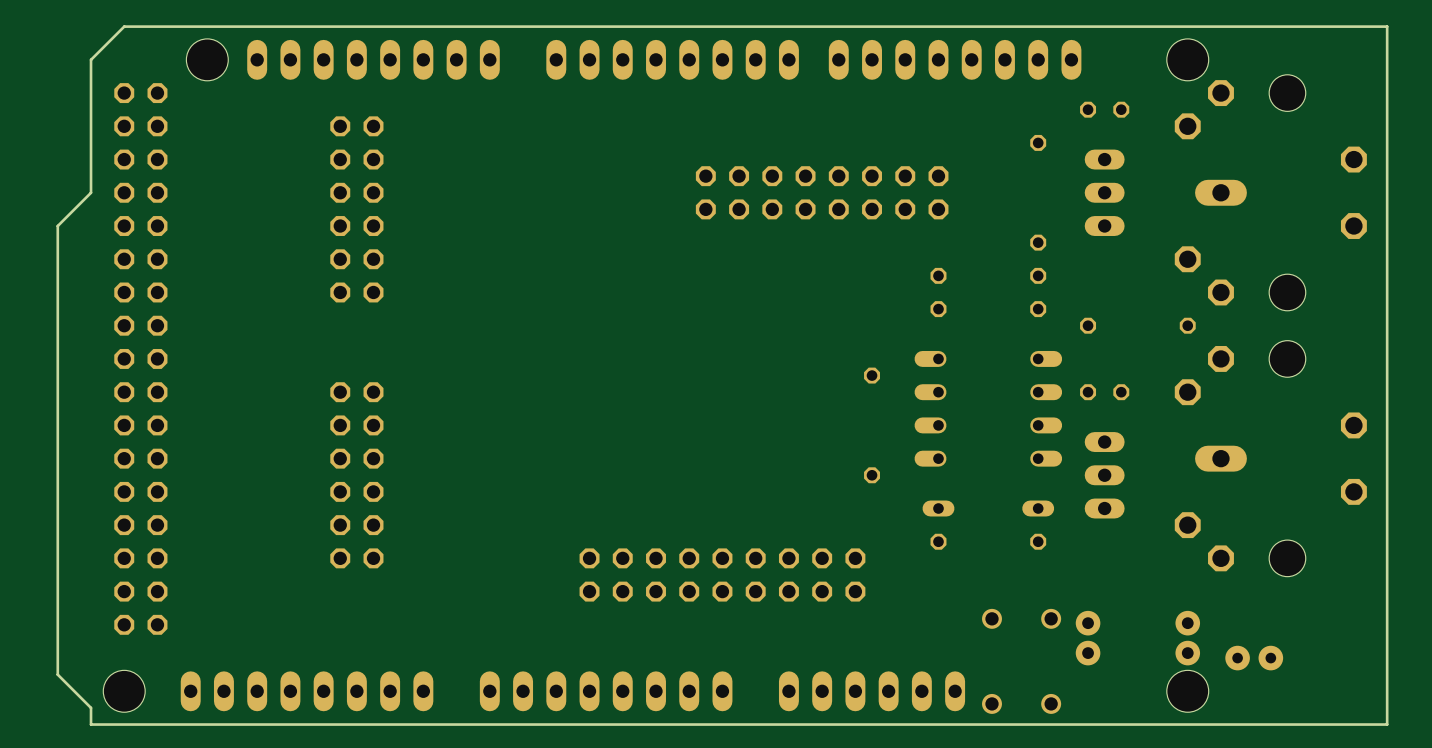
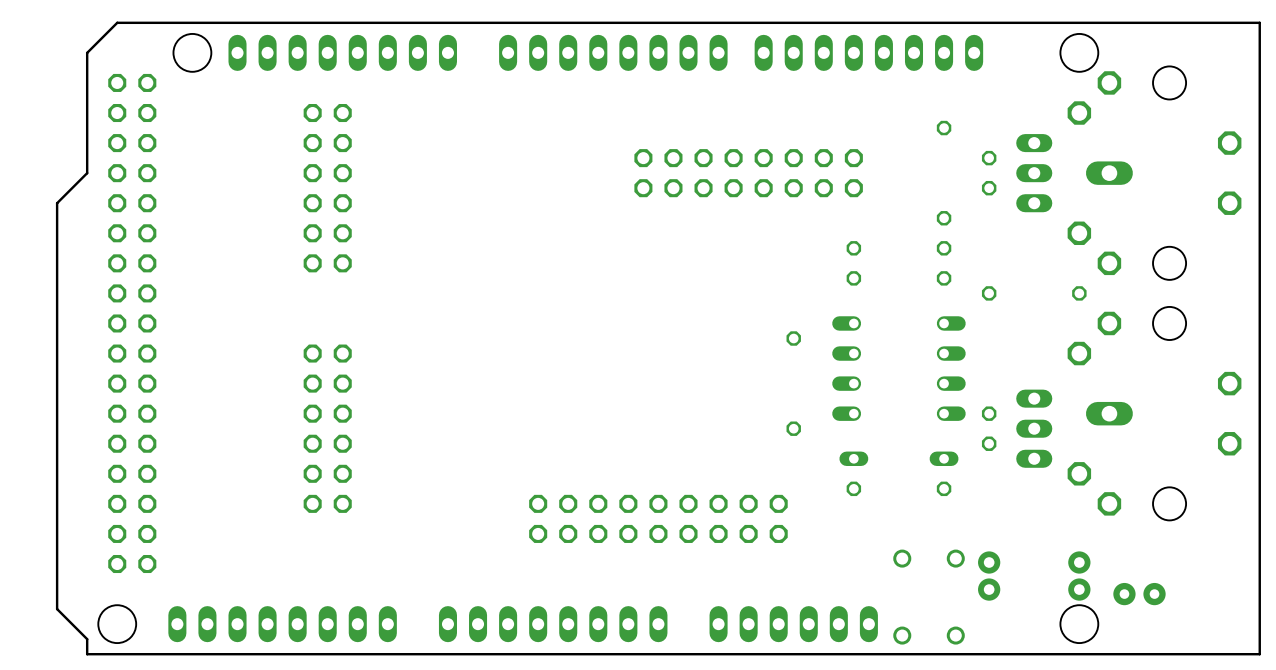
part rotation: 0° (1104, 109) -> 90° clockwise (989, 173)
part position: (1104, 109) -> (989, 173)
part position: (1104, 192) -> (1034, 173)
part rotation: 0° (1104, 392) -> 90° clockwise (989, 428)
part position: (1104, 392) -> (989, 428)
part position: (1104, 475) -> (1034, 428)

